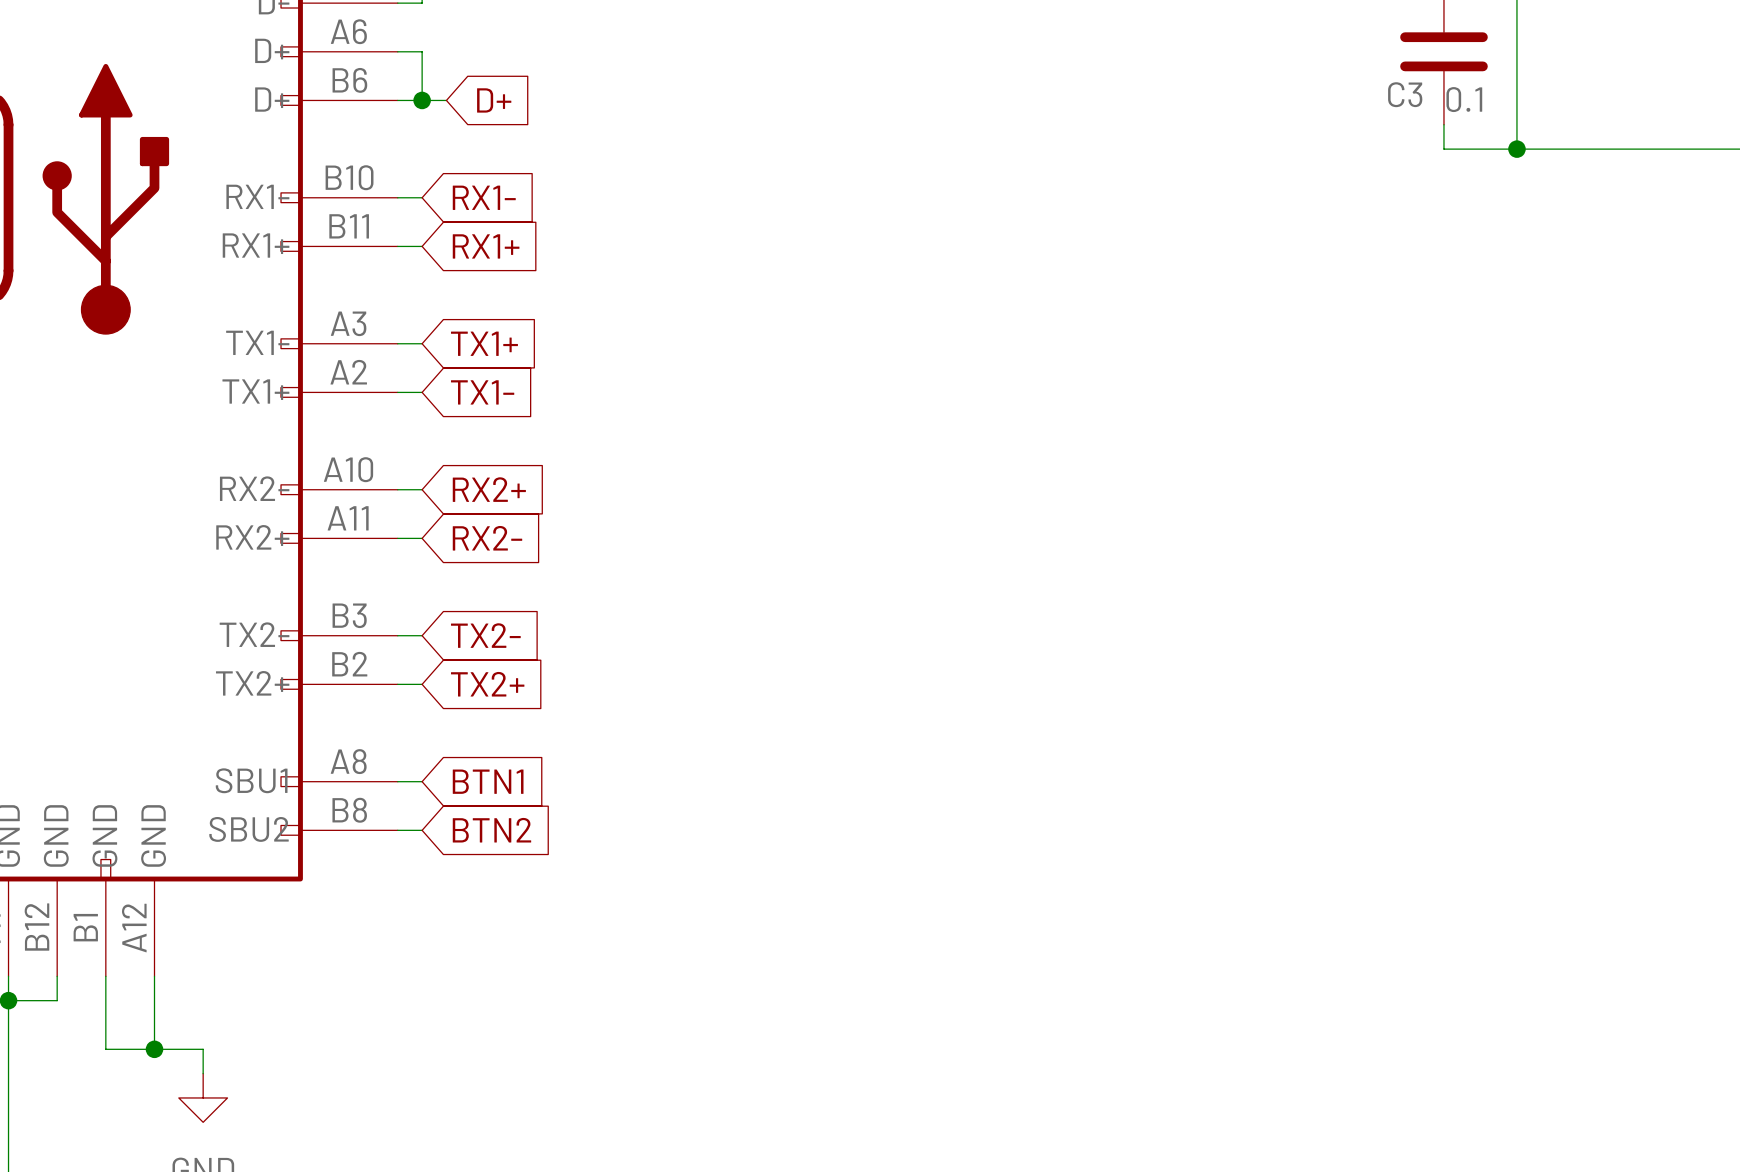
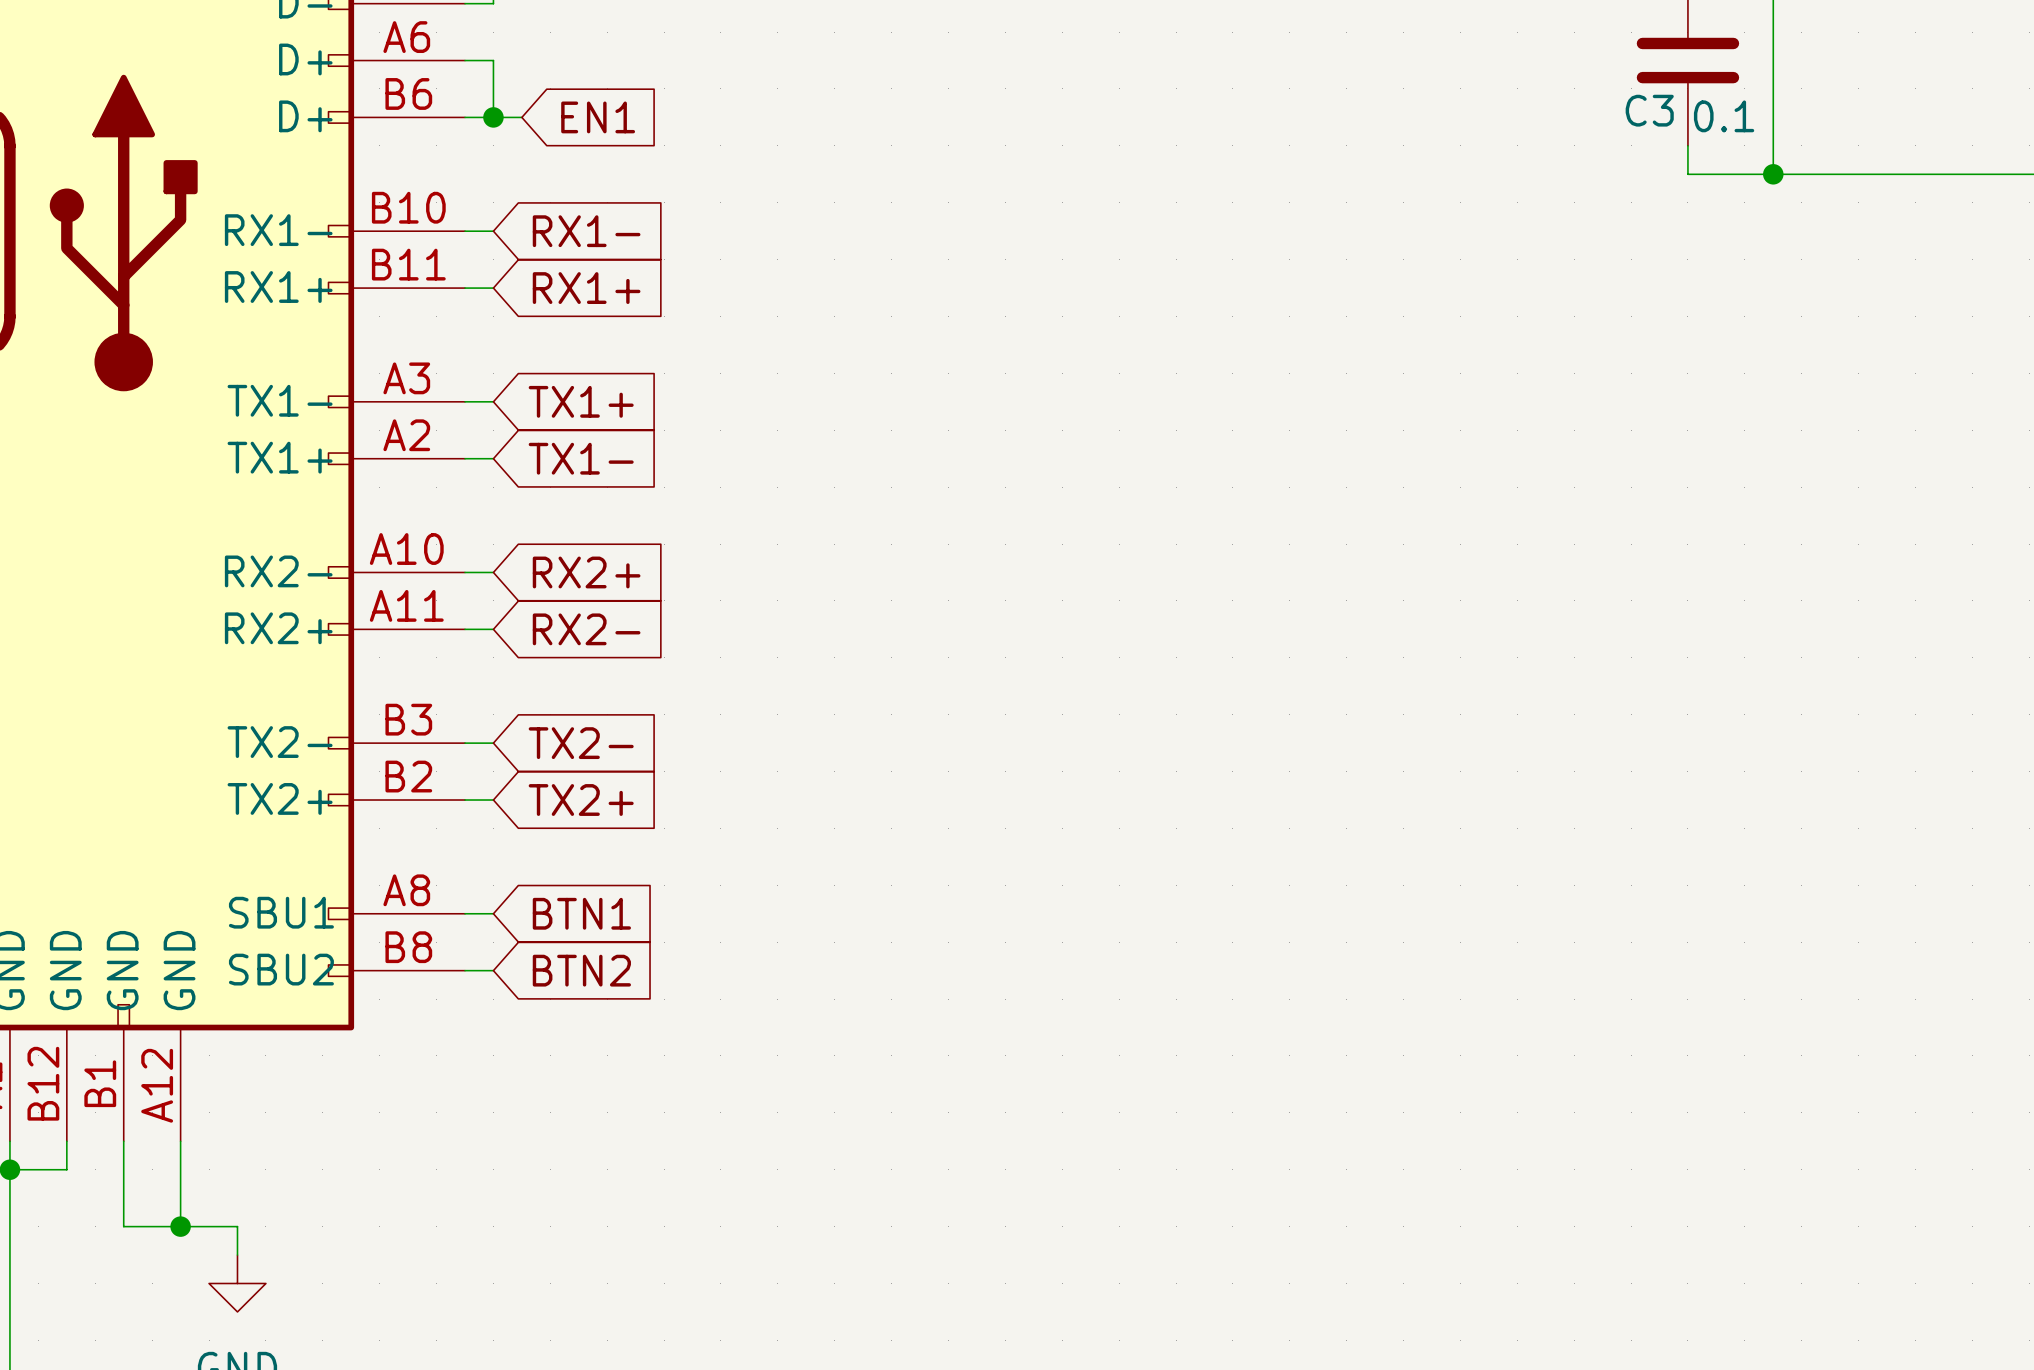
global label: D+ (494, 100) -> EN1 (598, 117)

